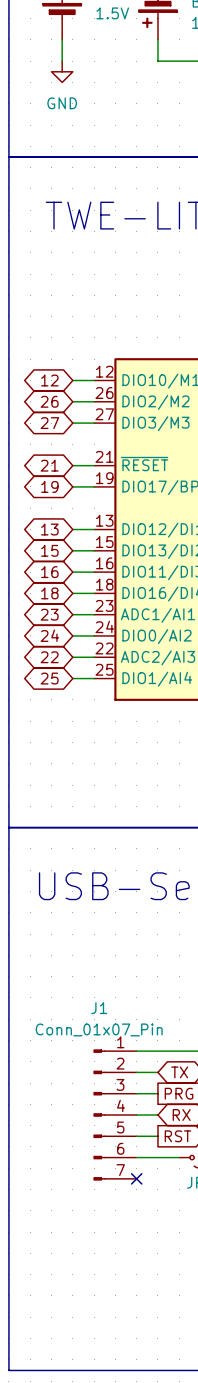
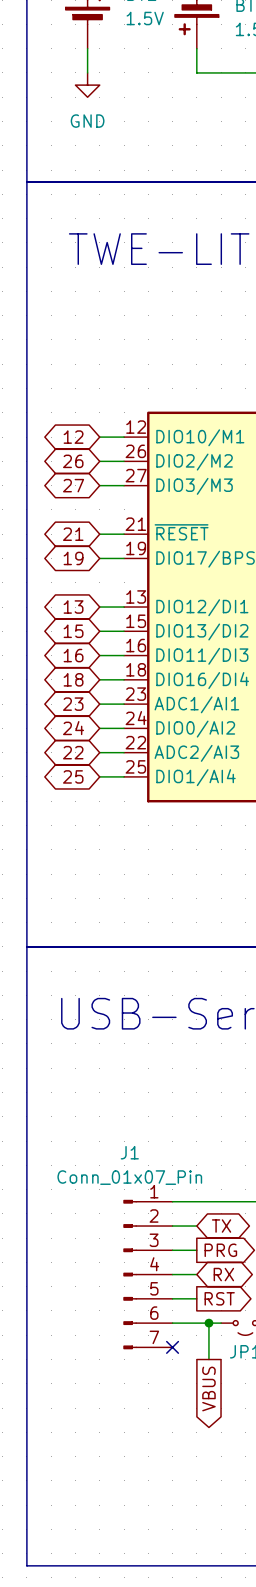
wire: none -> (208, 1323) (208, 1359)
junction: none -> (208, 1323)
global label: none -> VBUS (208, 1389)

